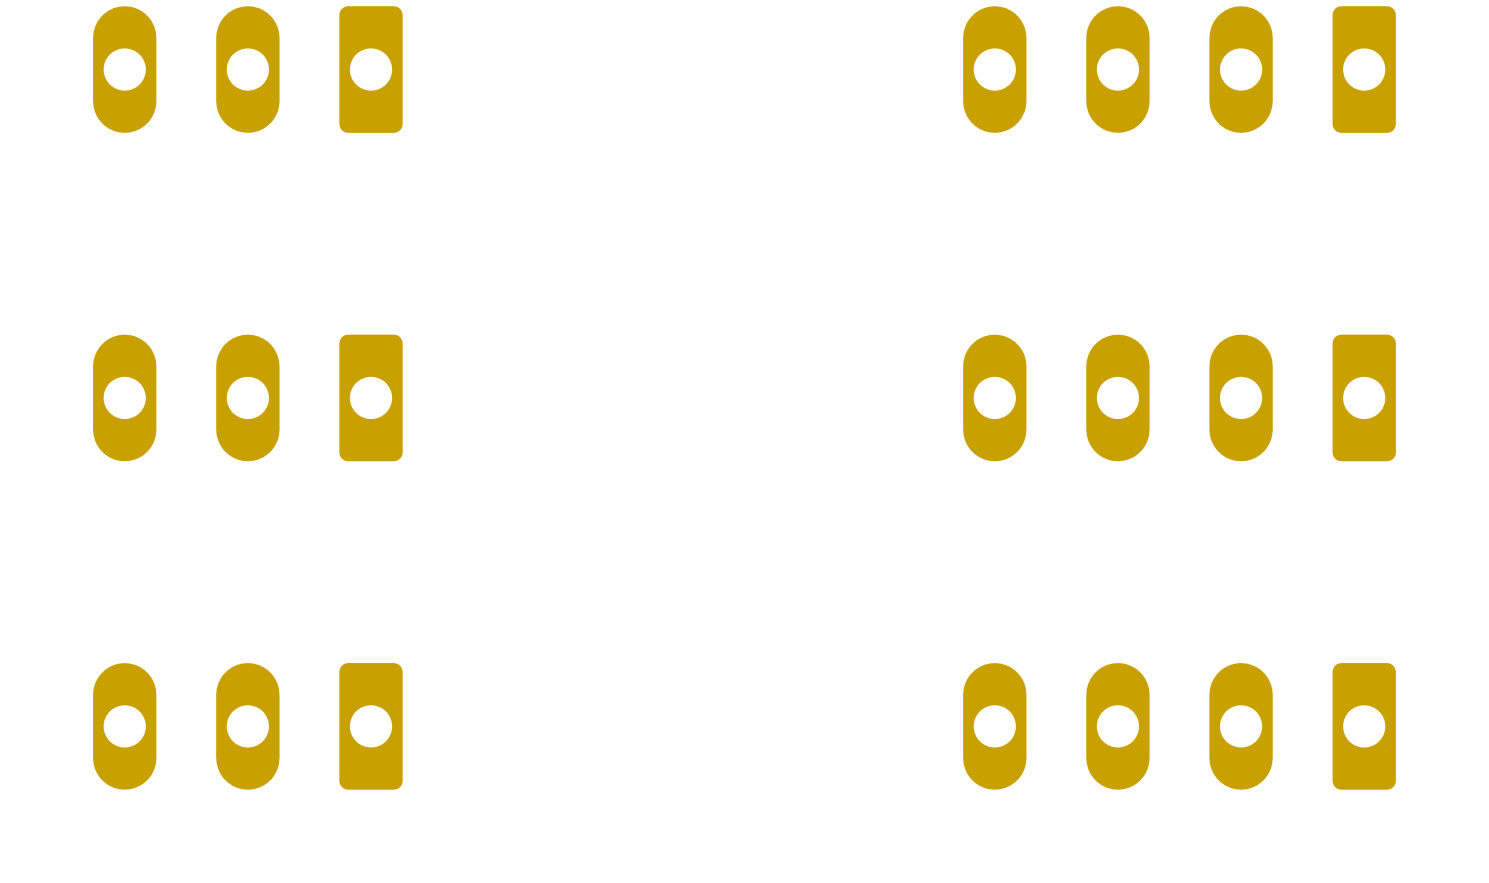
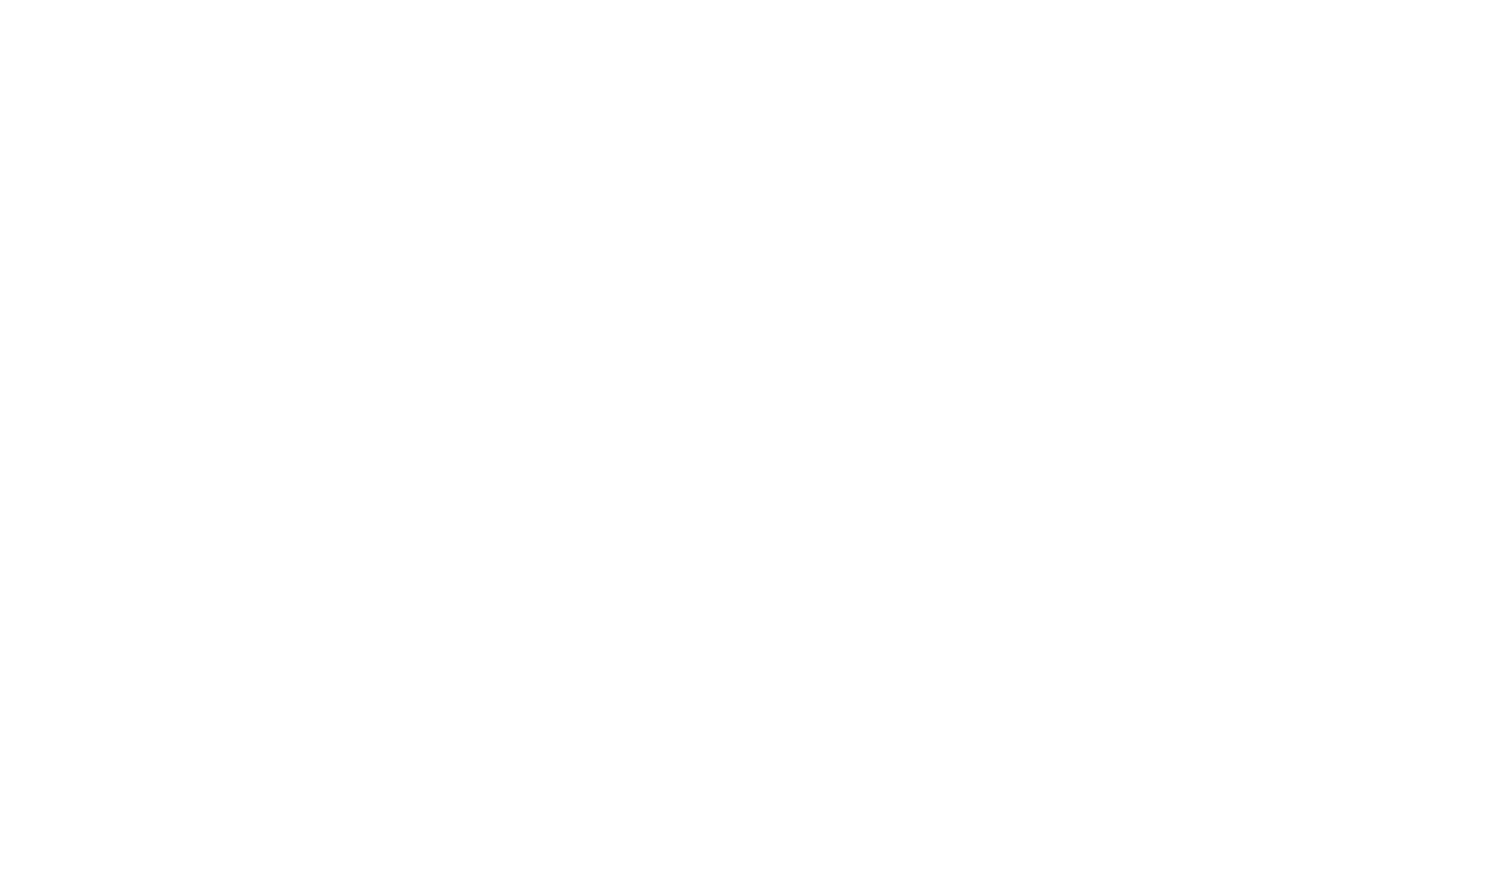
part: (247, 69) -> none
part: (1179, 69) -> none
part: (247, 397) -> none
part: (1179, 397) -> none
part: (247, 726) -> none
part: (1179, 726) -> none

